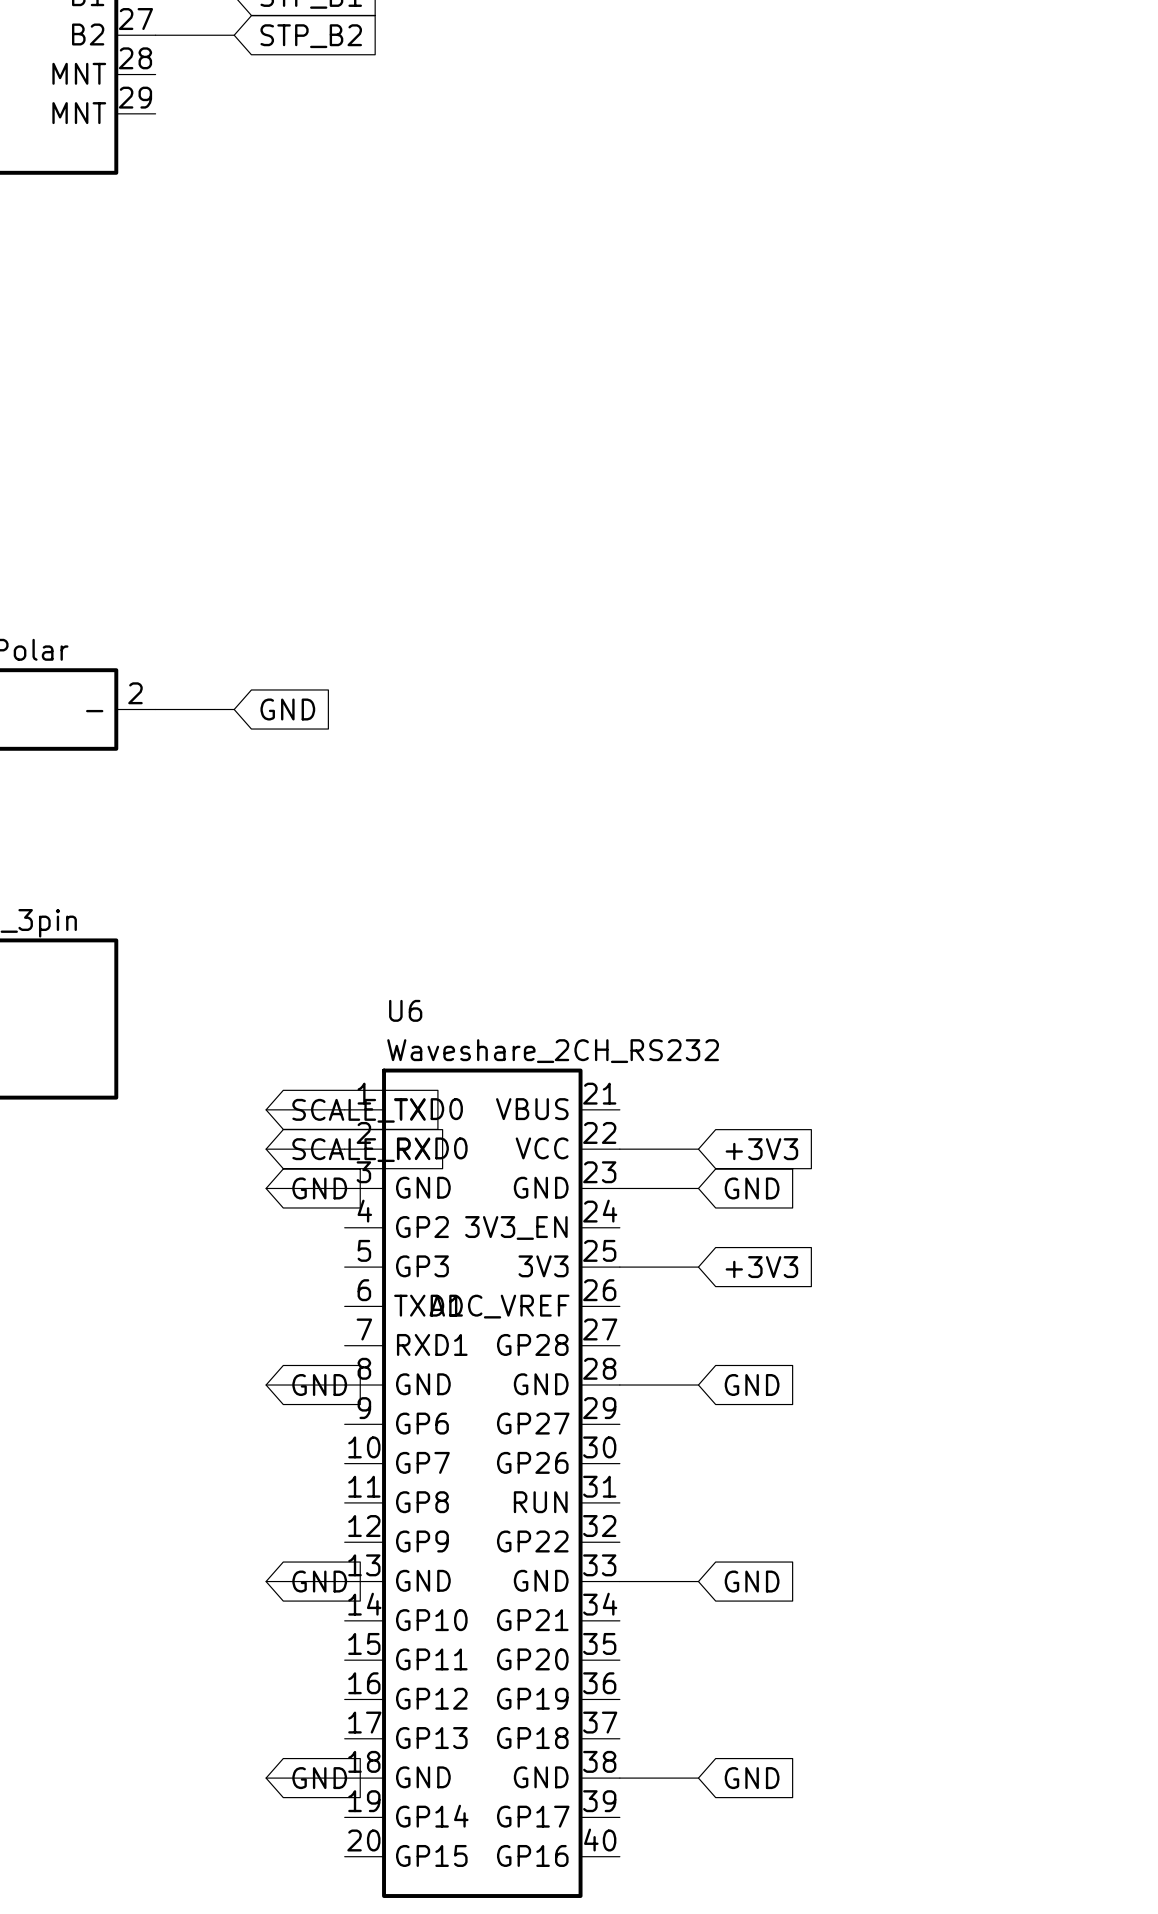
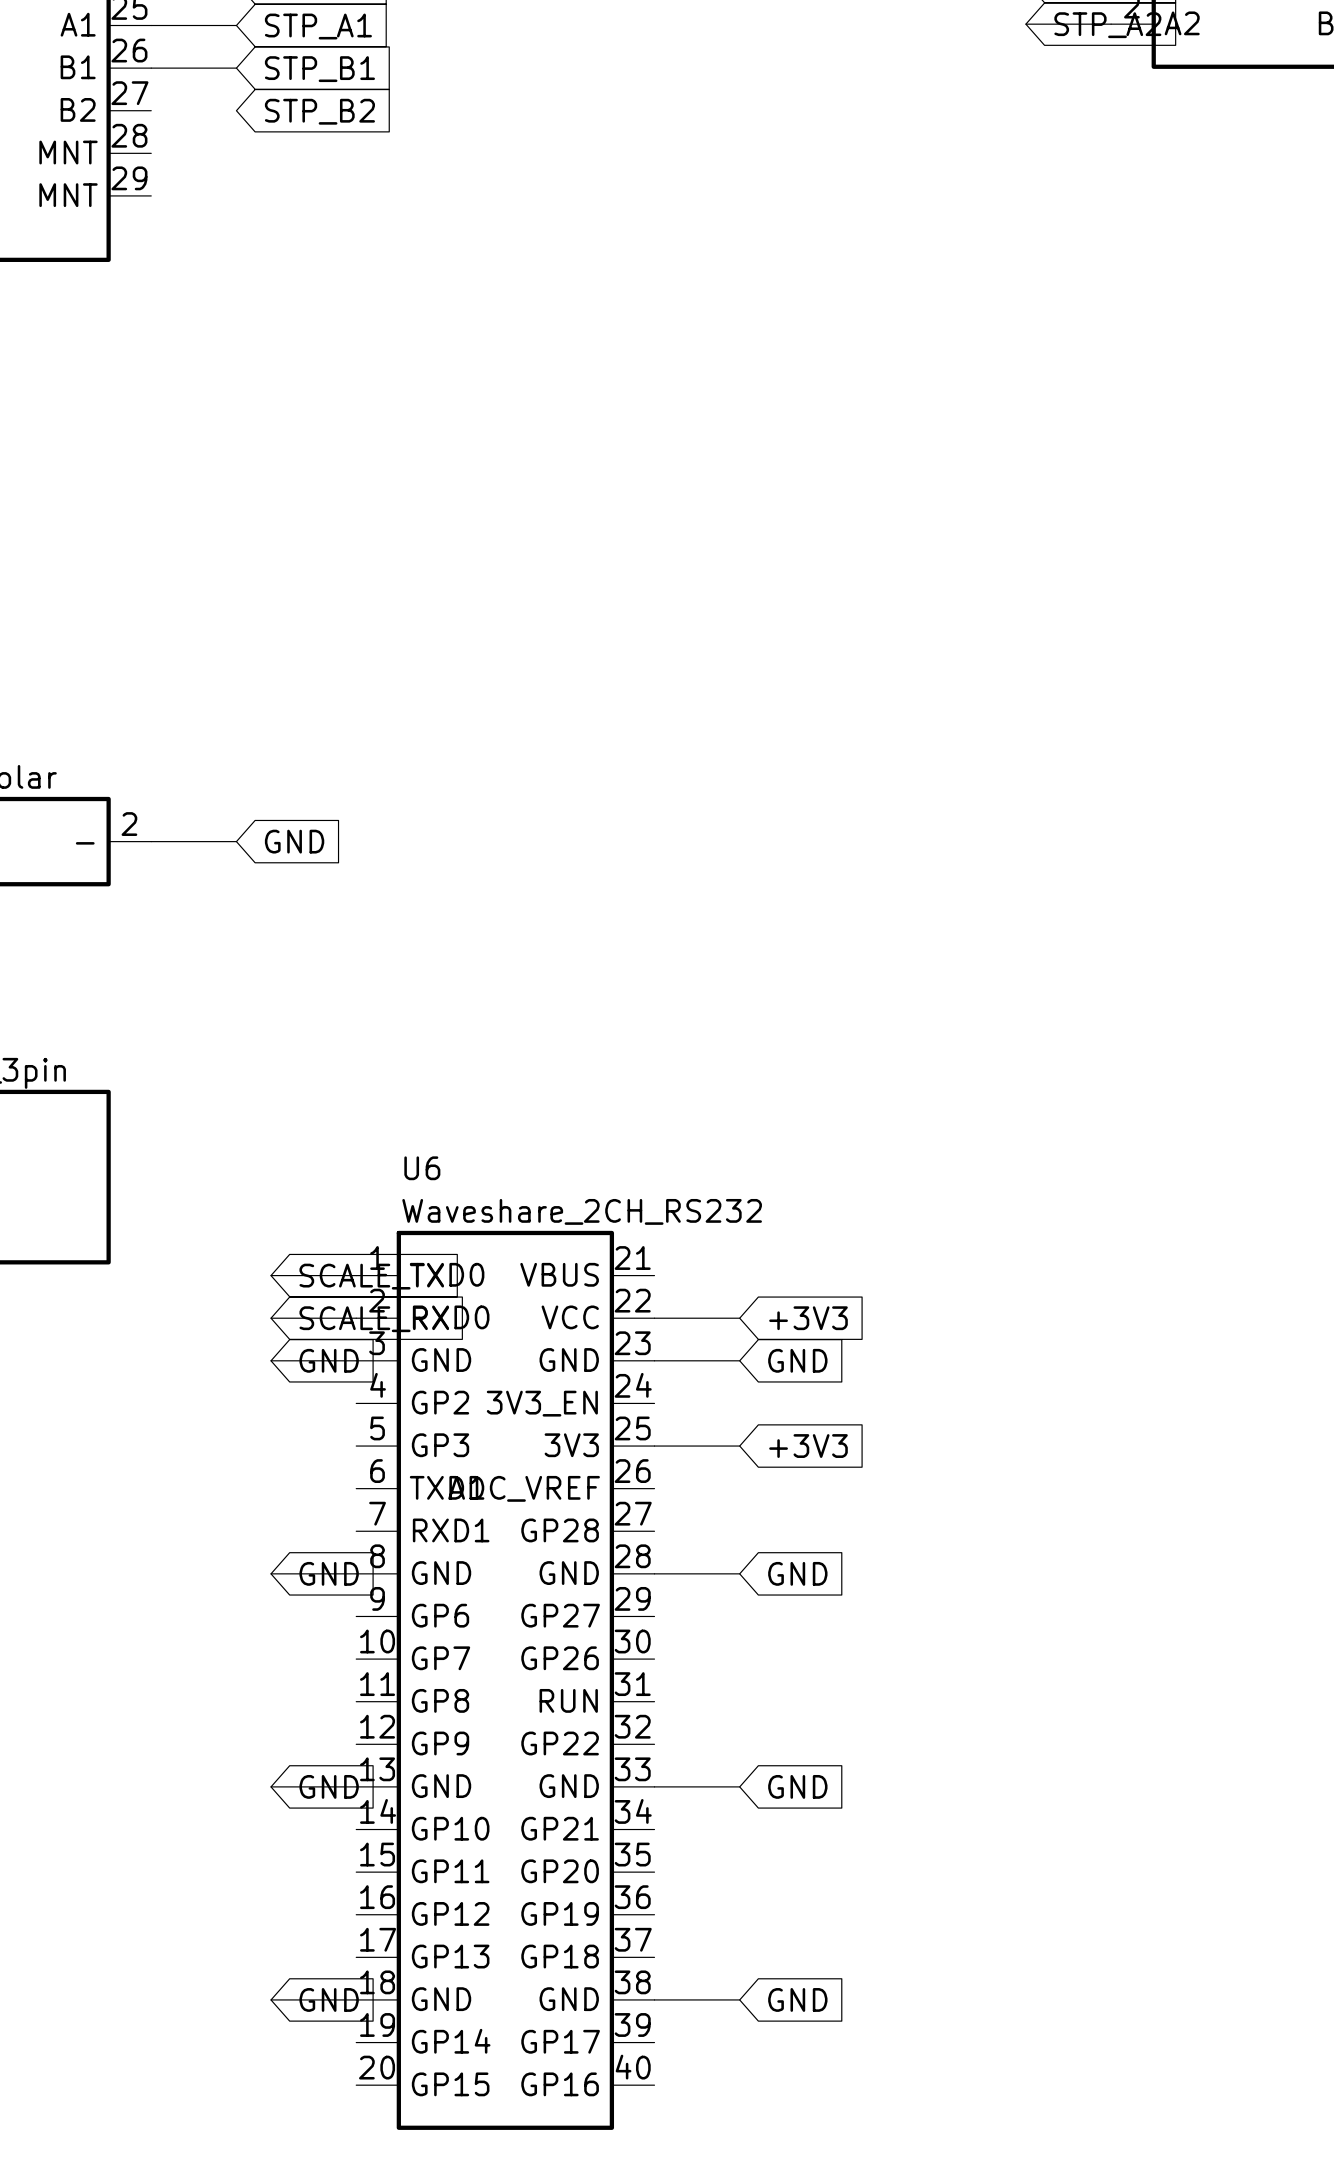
wire: (155, 35) (234, 35) -> none

